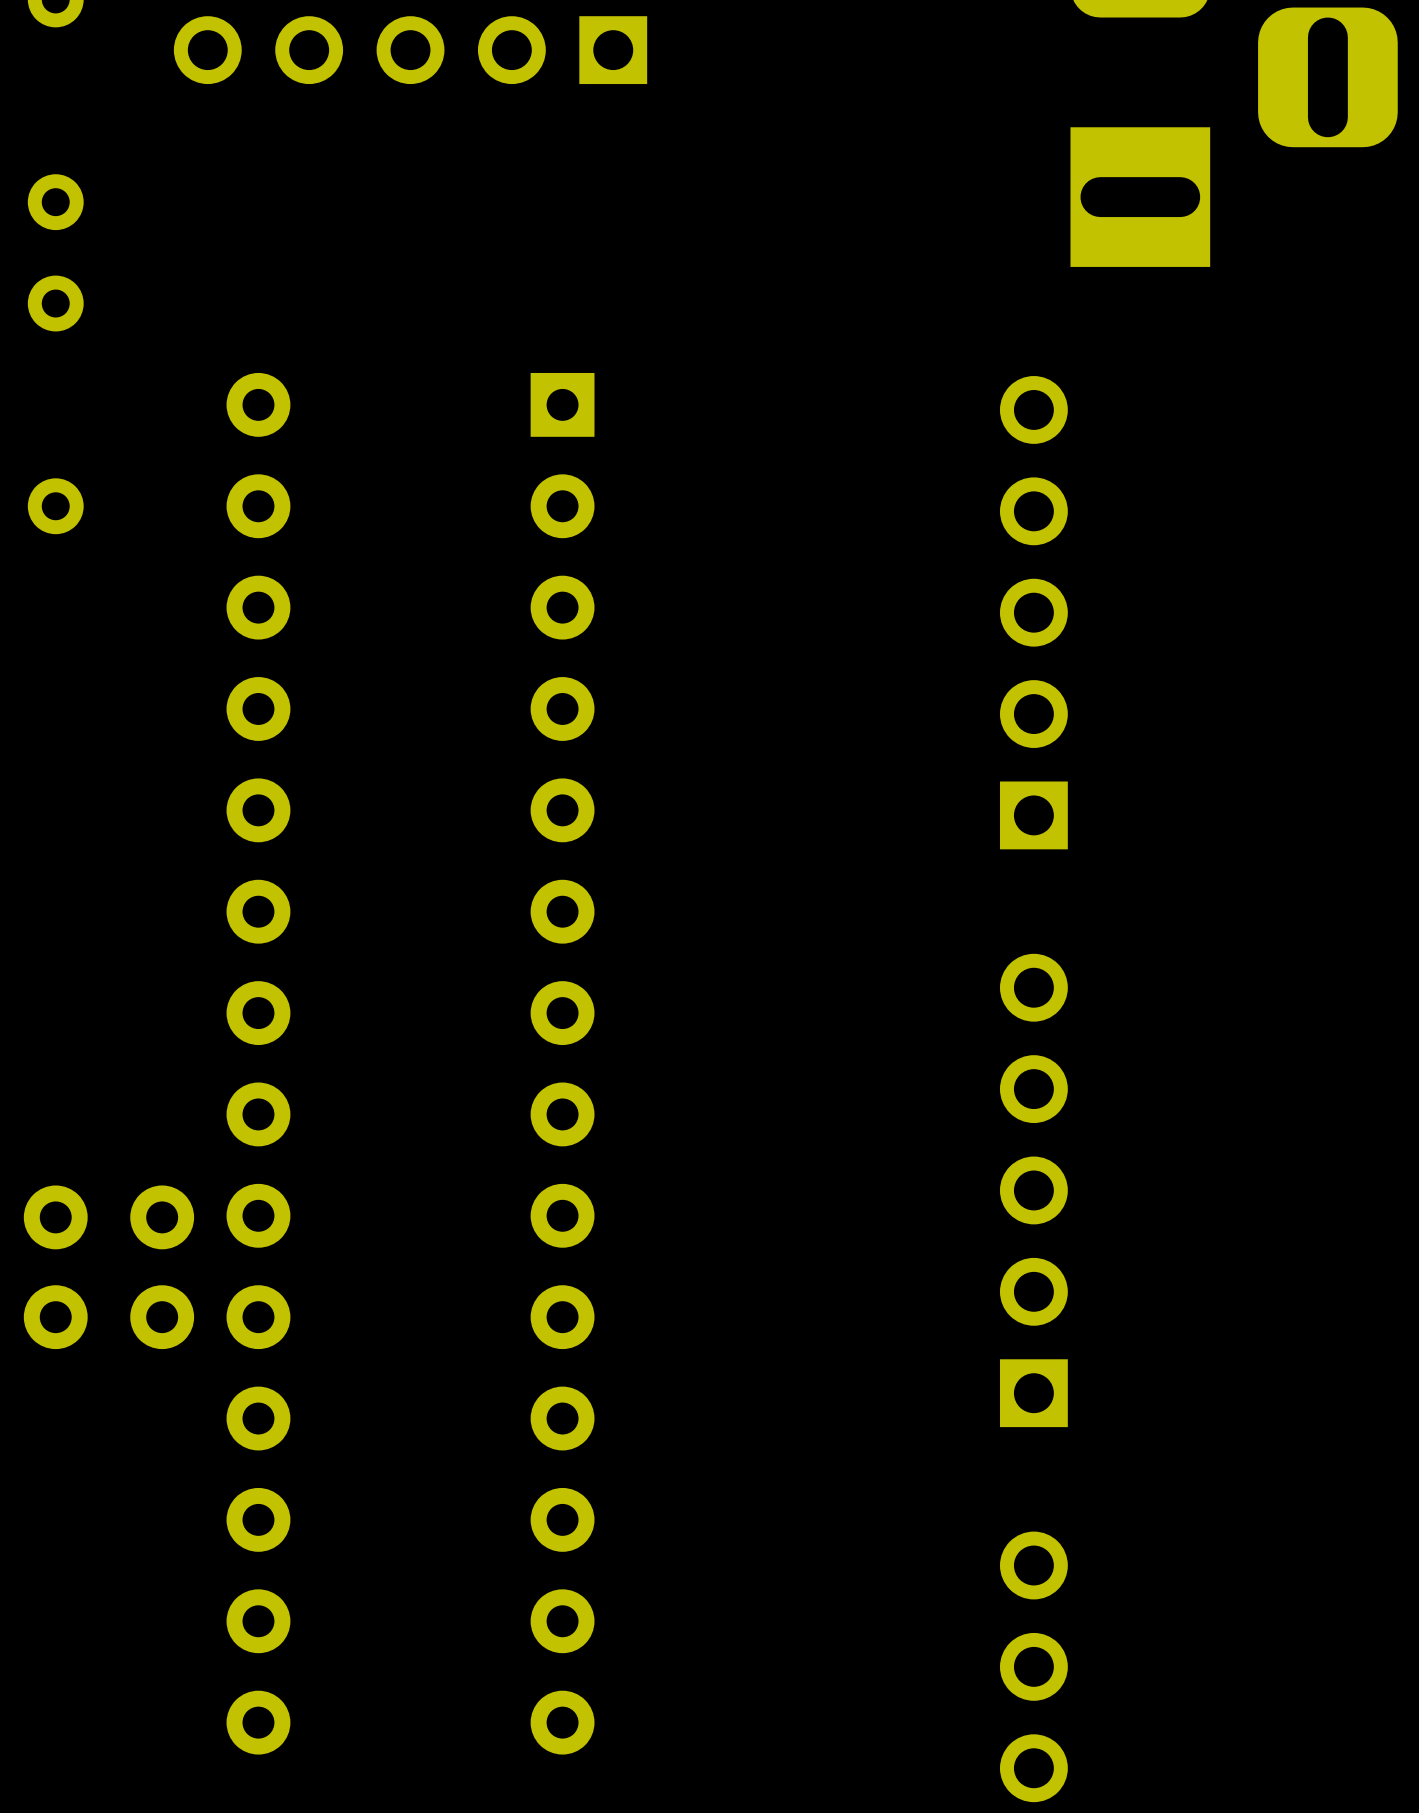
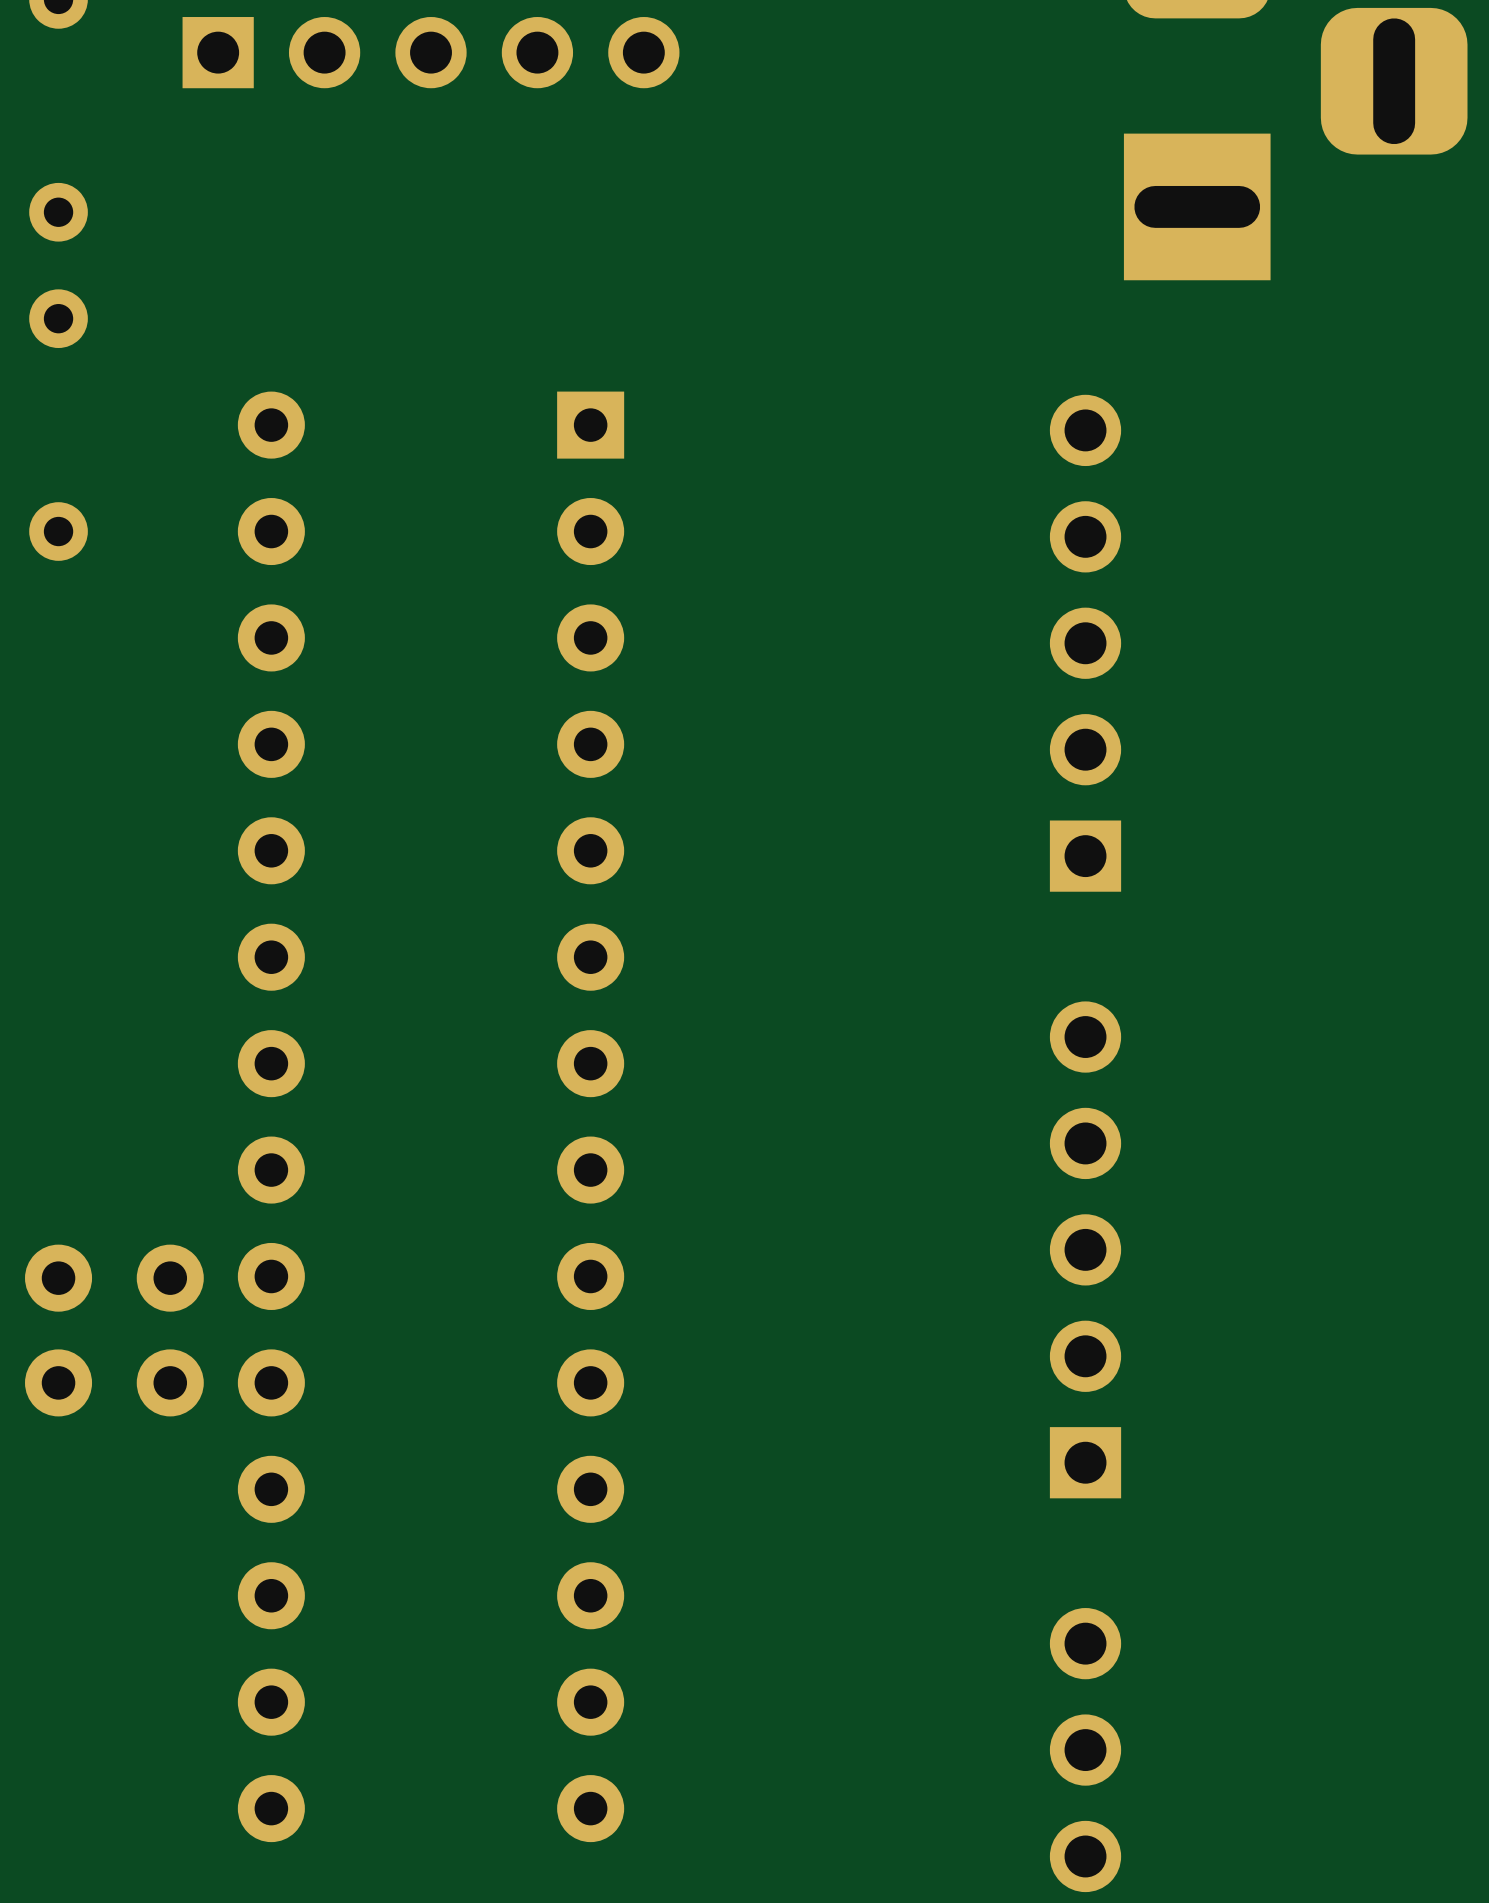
part rotation: 0° (410, 50) -> 180° (431, 52)

